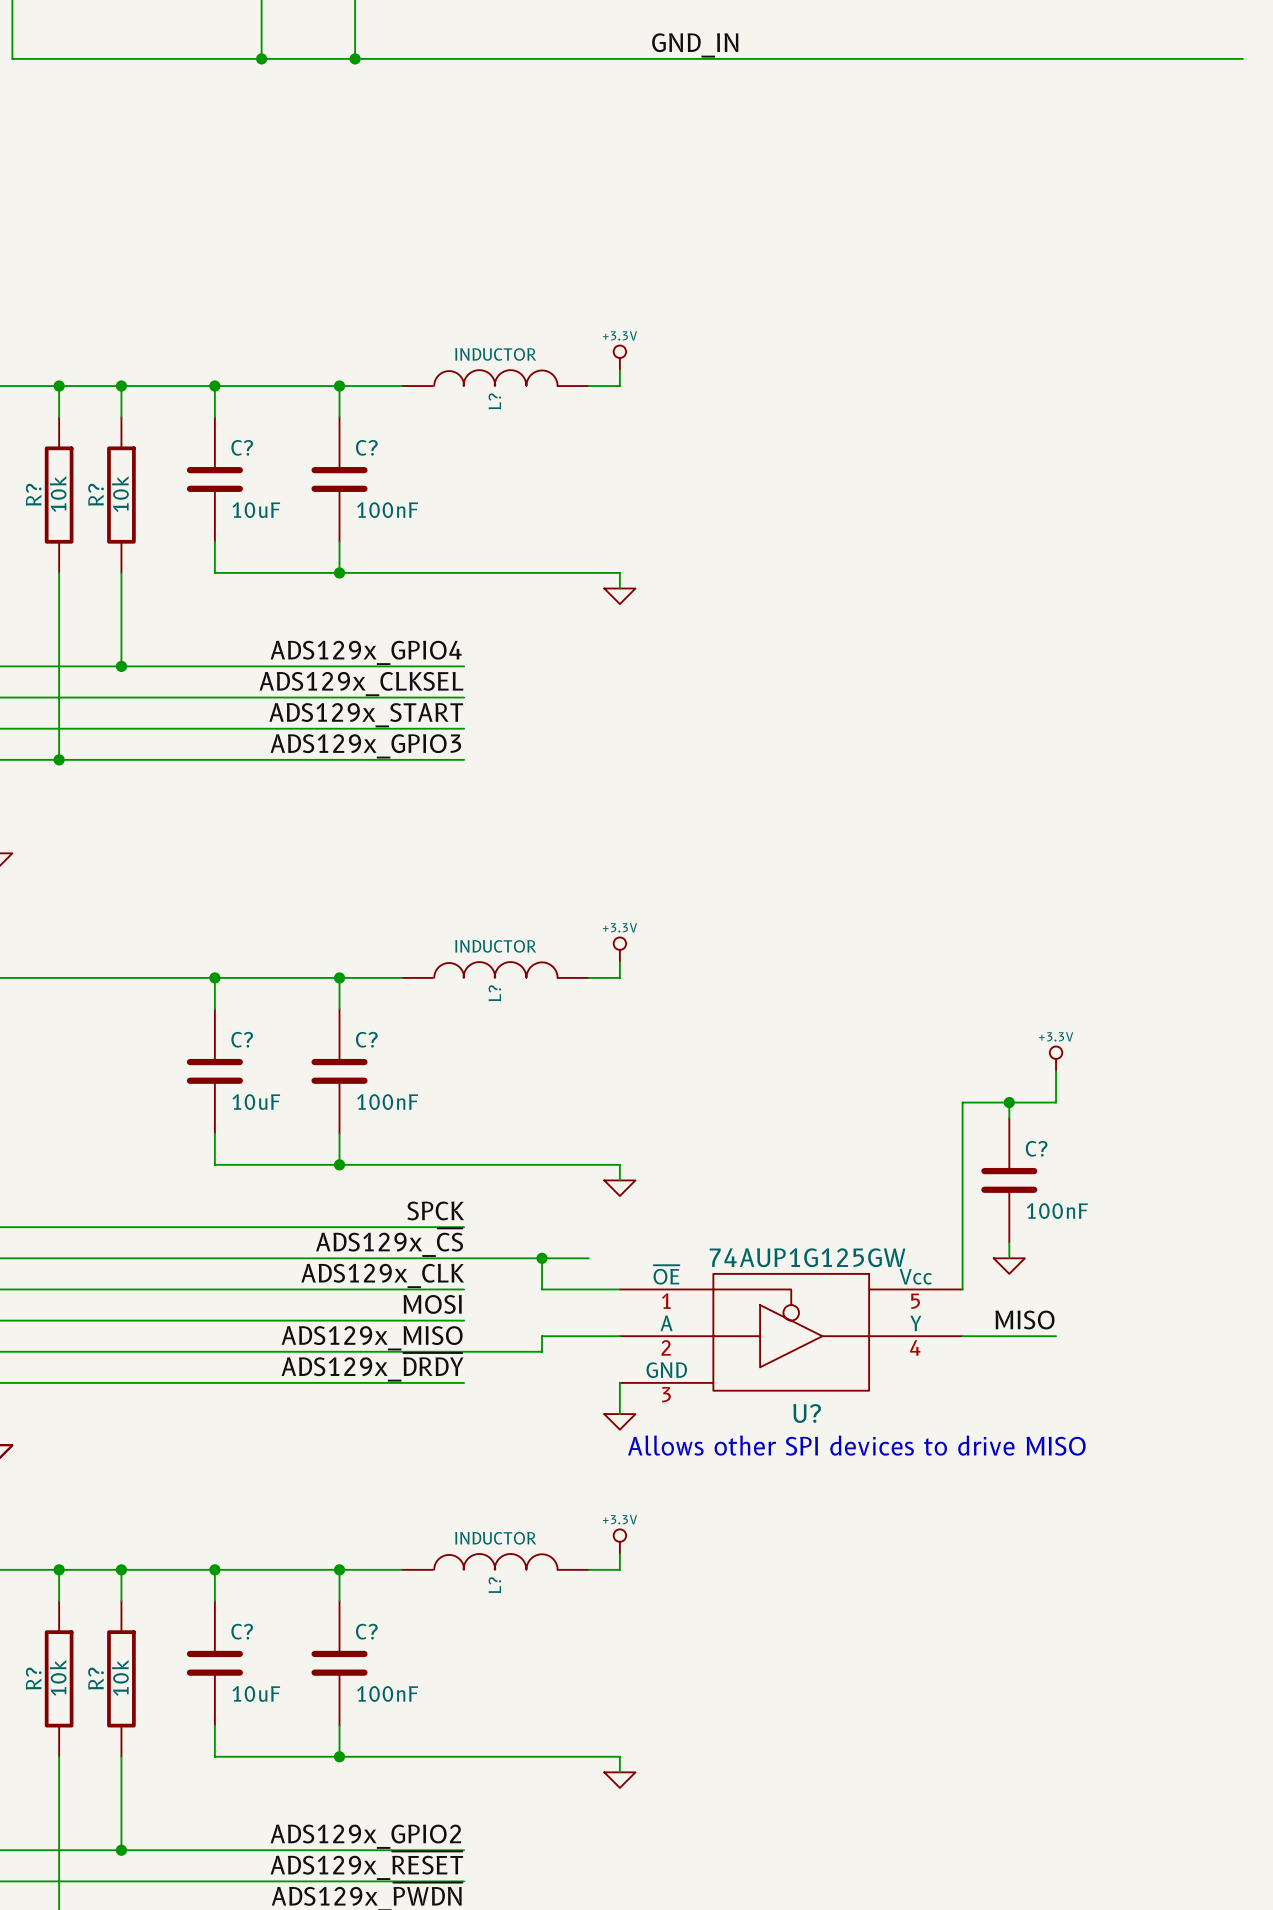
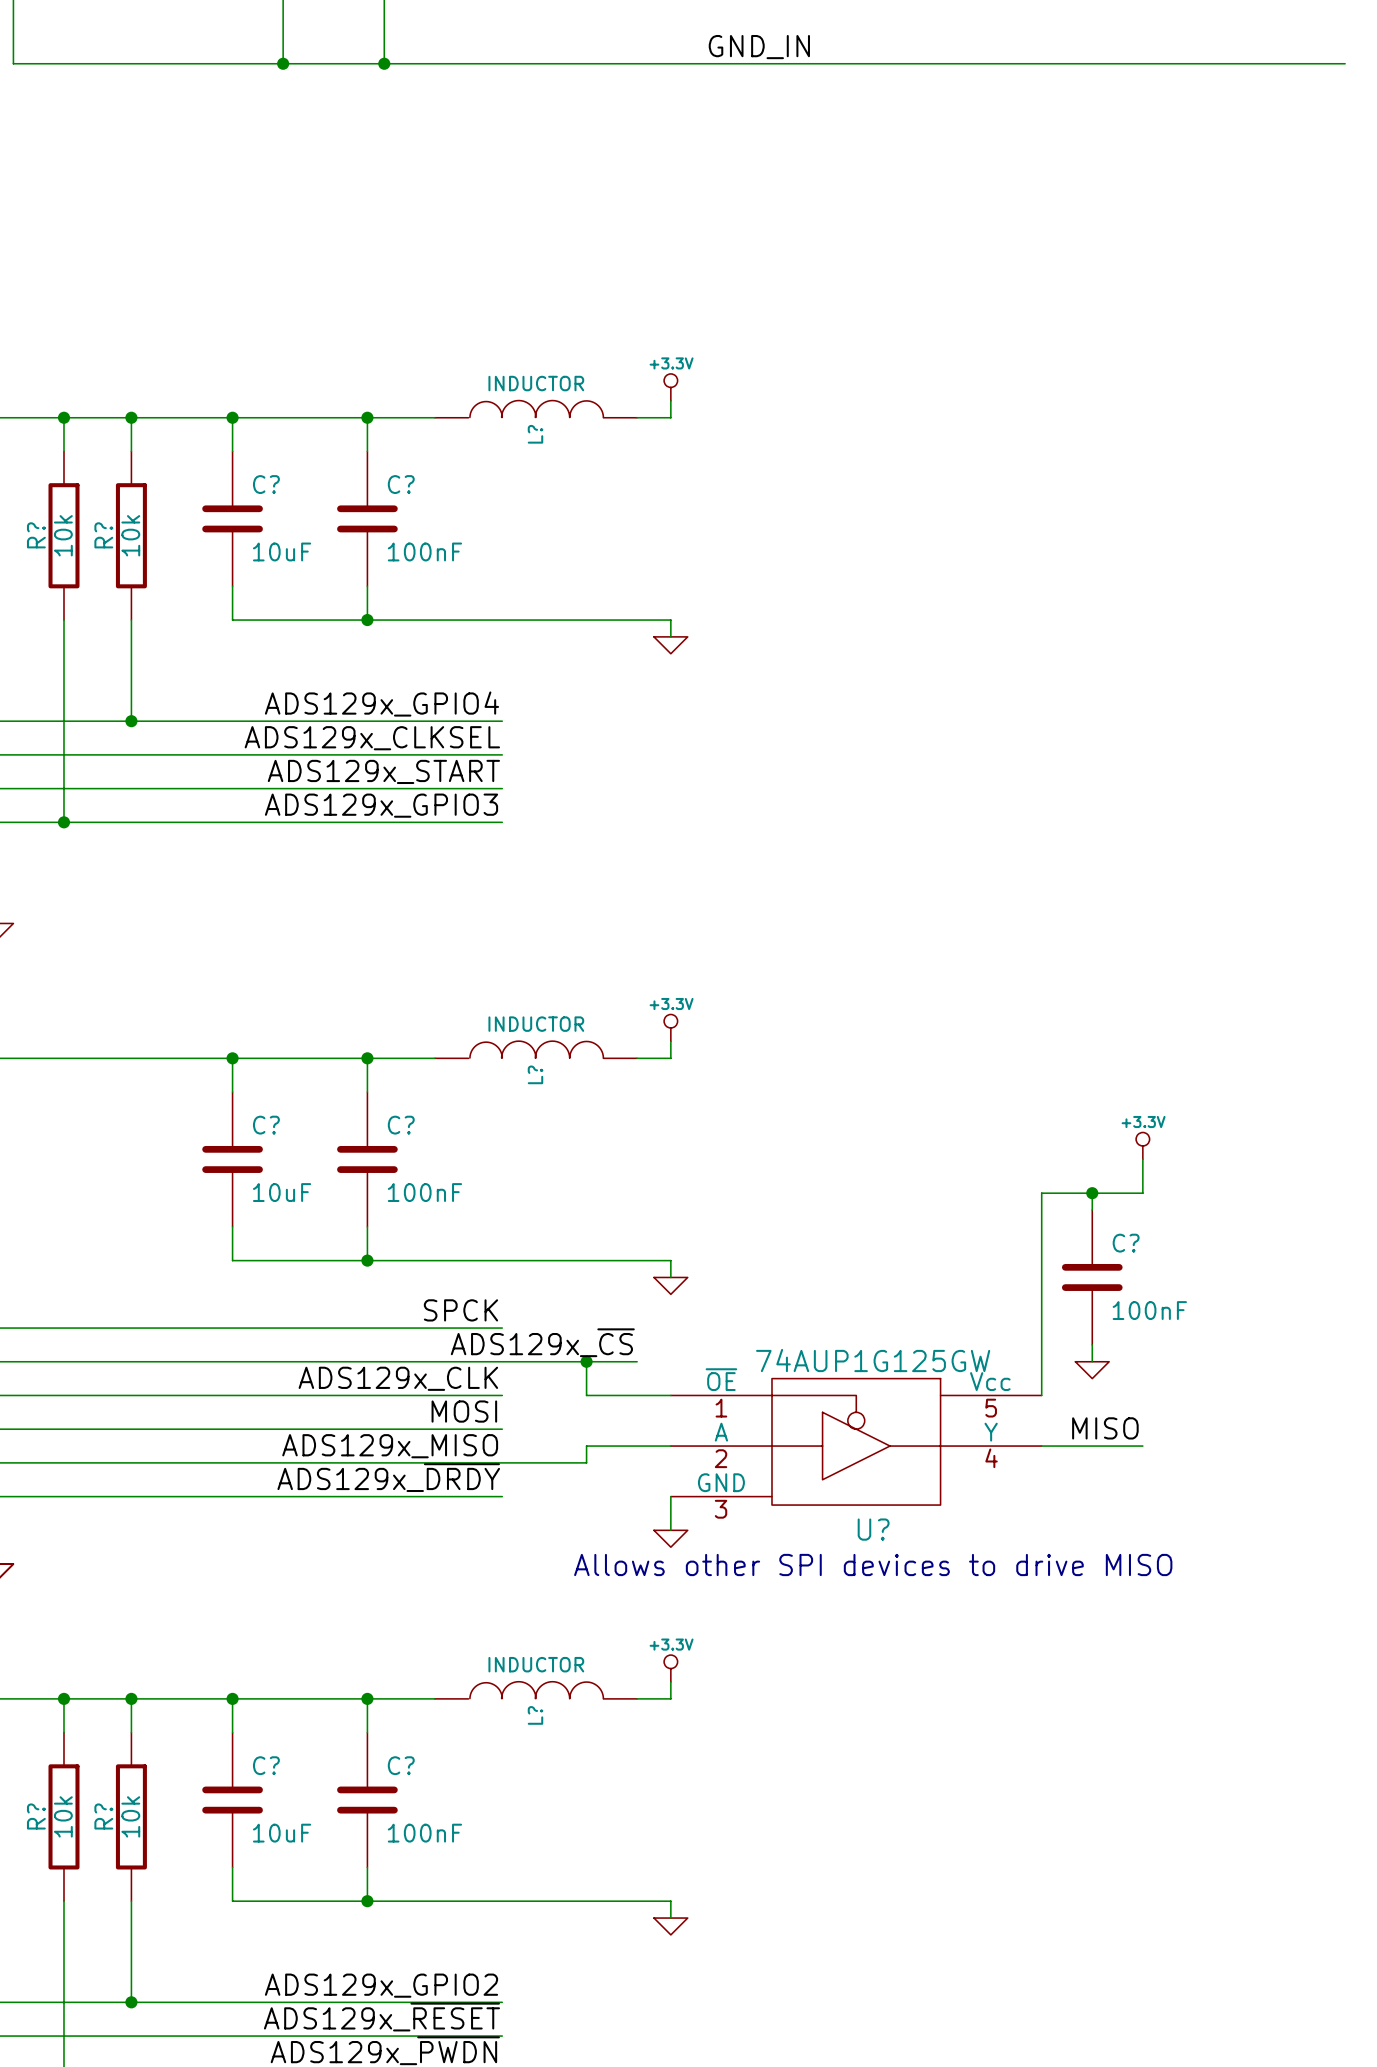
label position: ADS129x_~{CS} (389, 1242) -> ADS129x_~{CS} (542, 1342)

